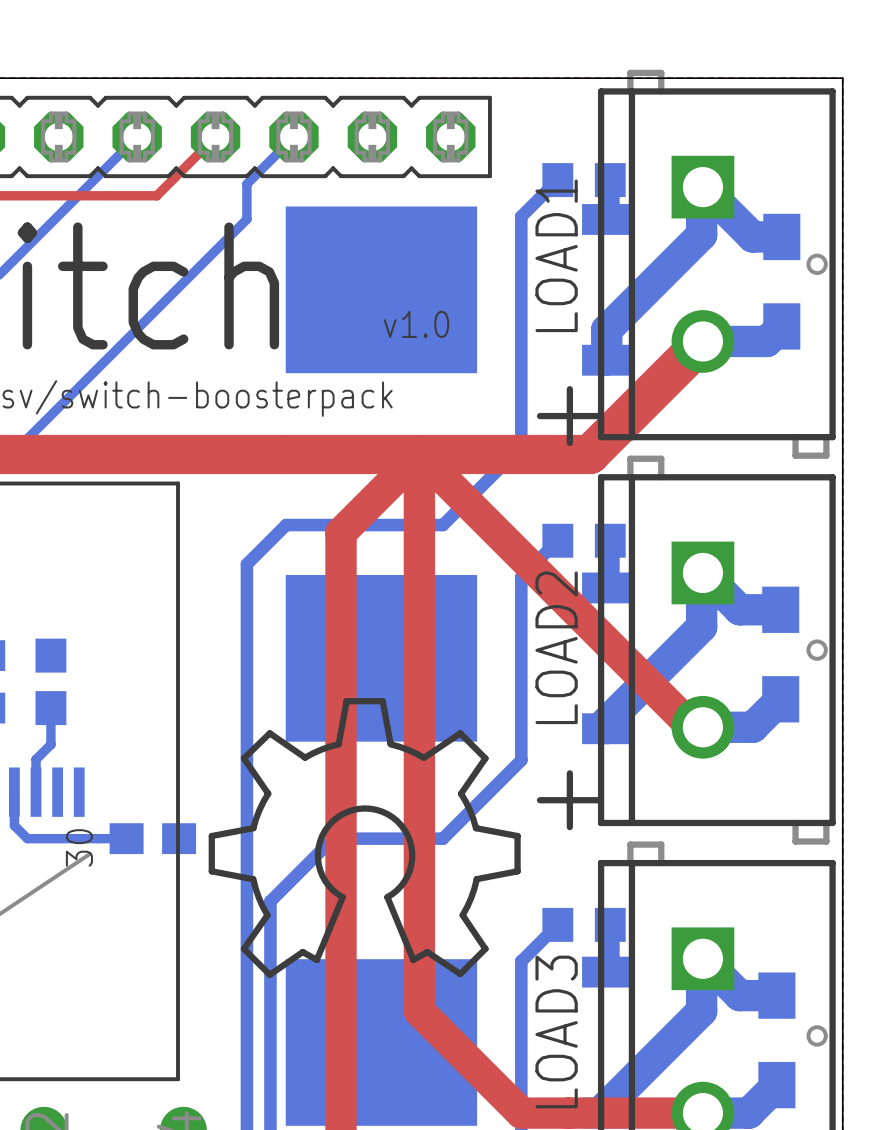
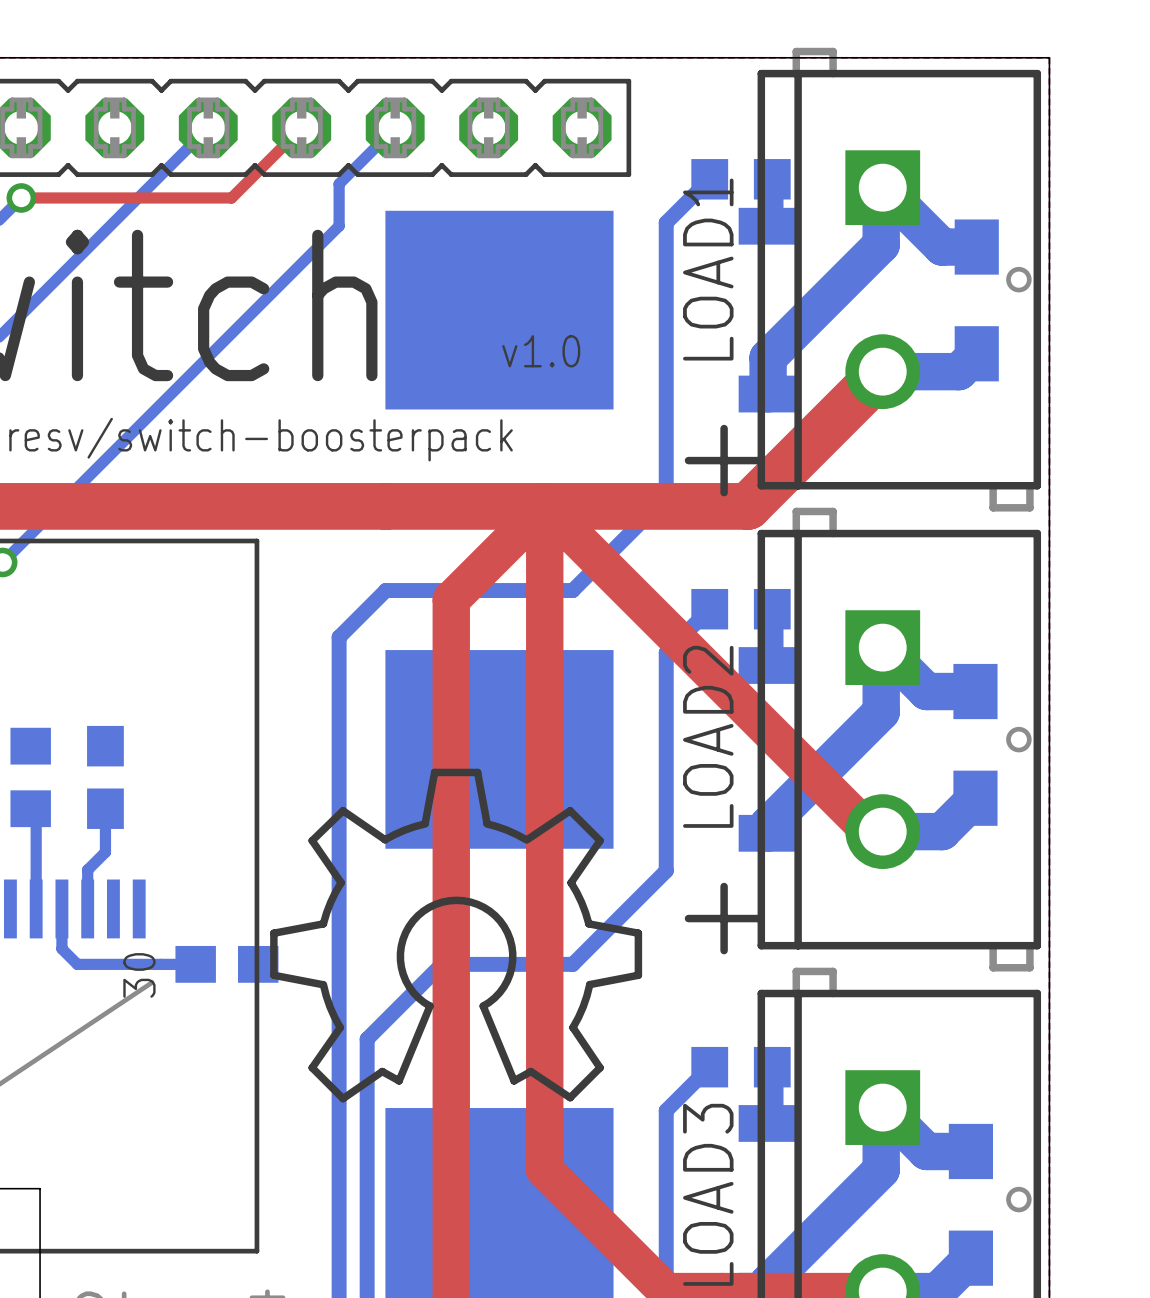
drawing position: (364, 837) -> (456, 935)

